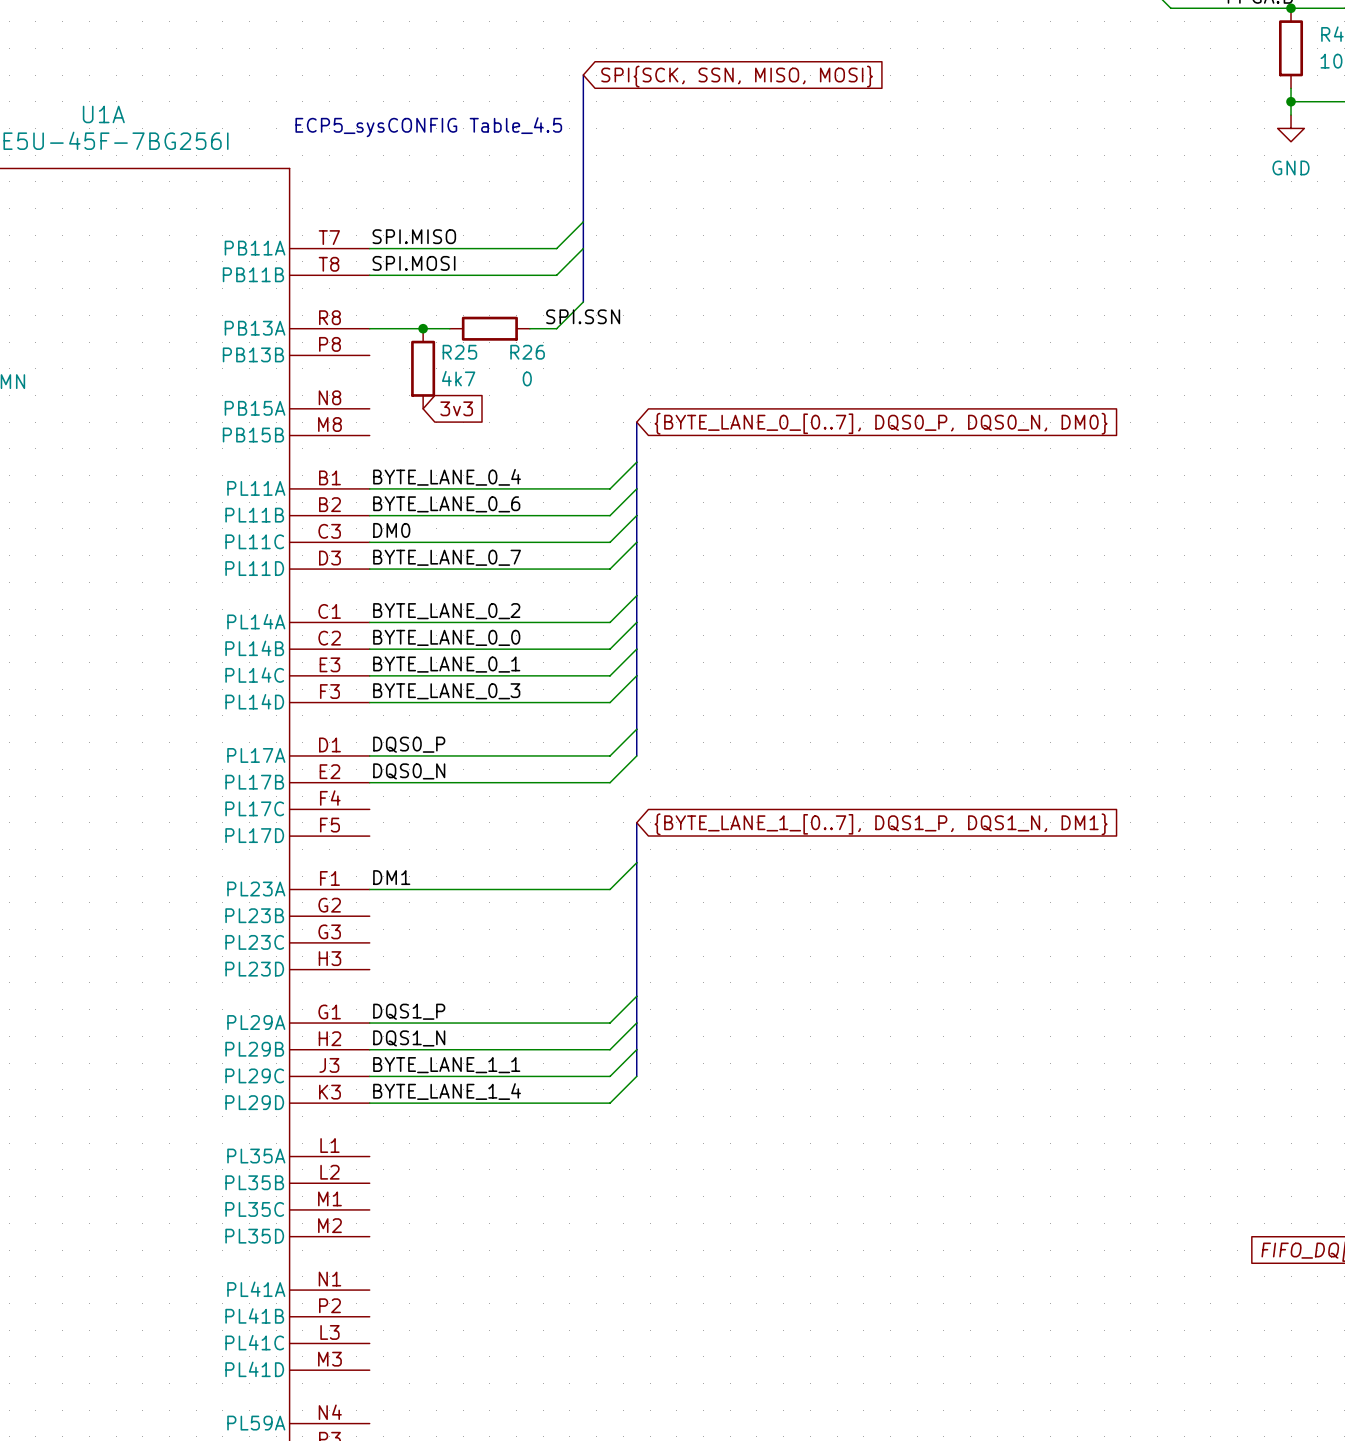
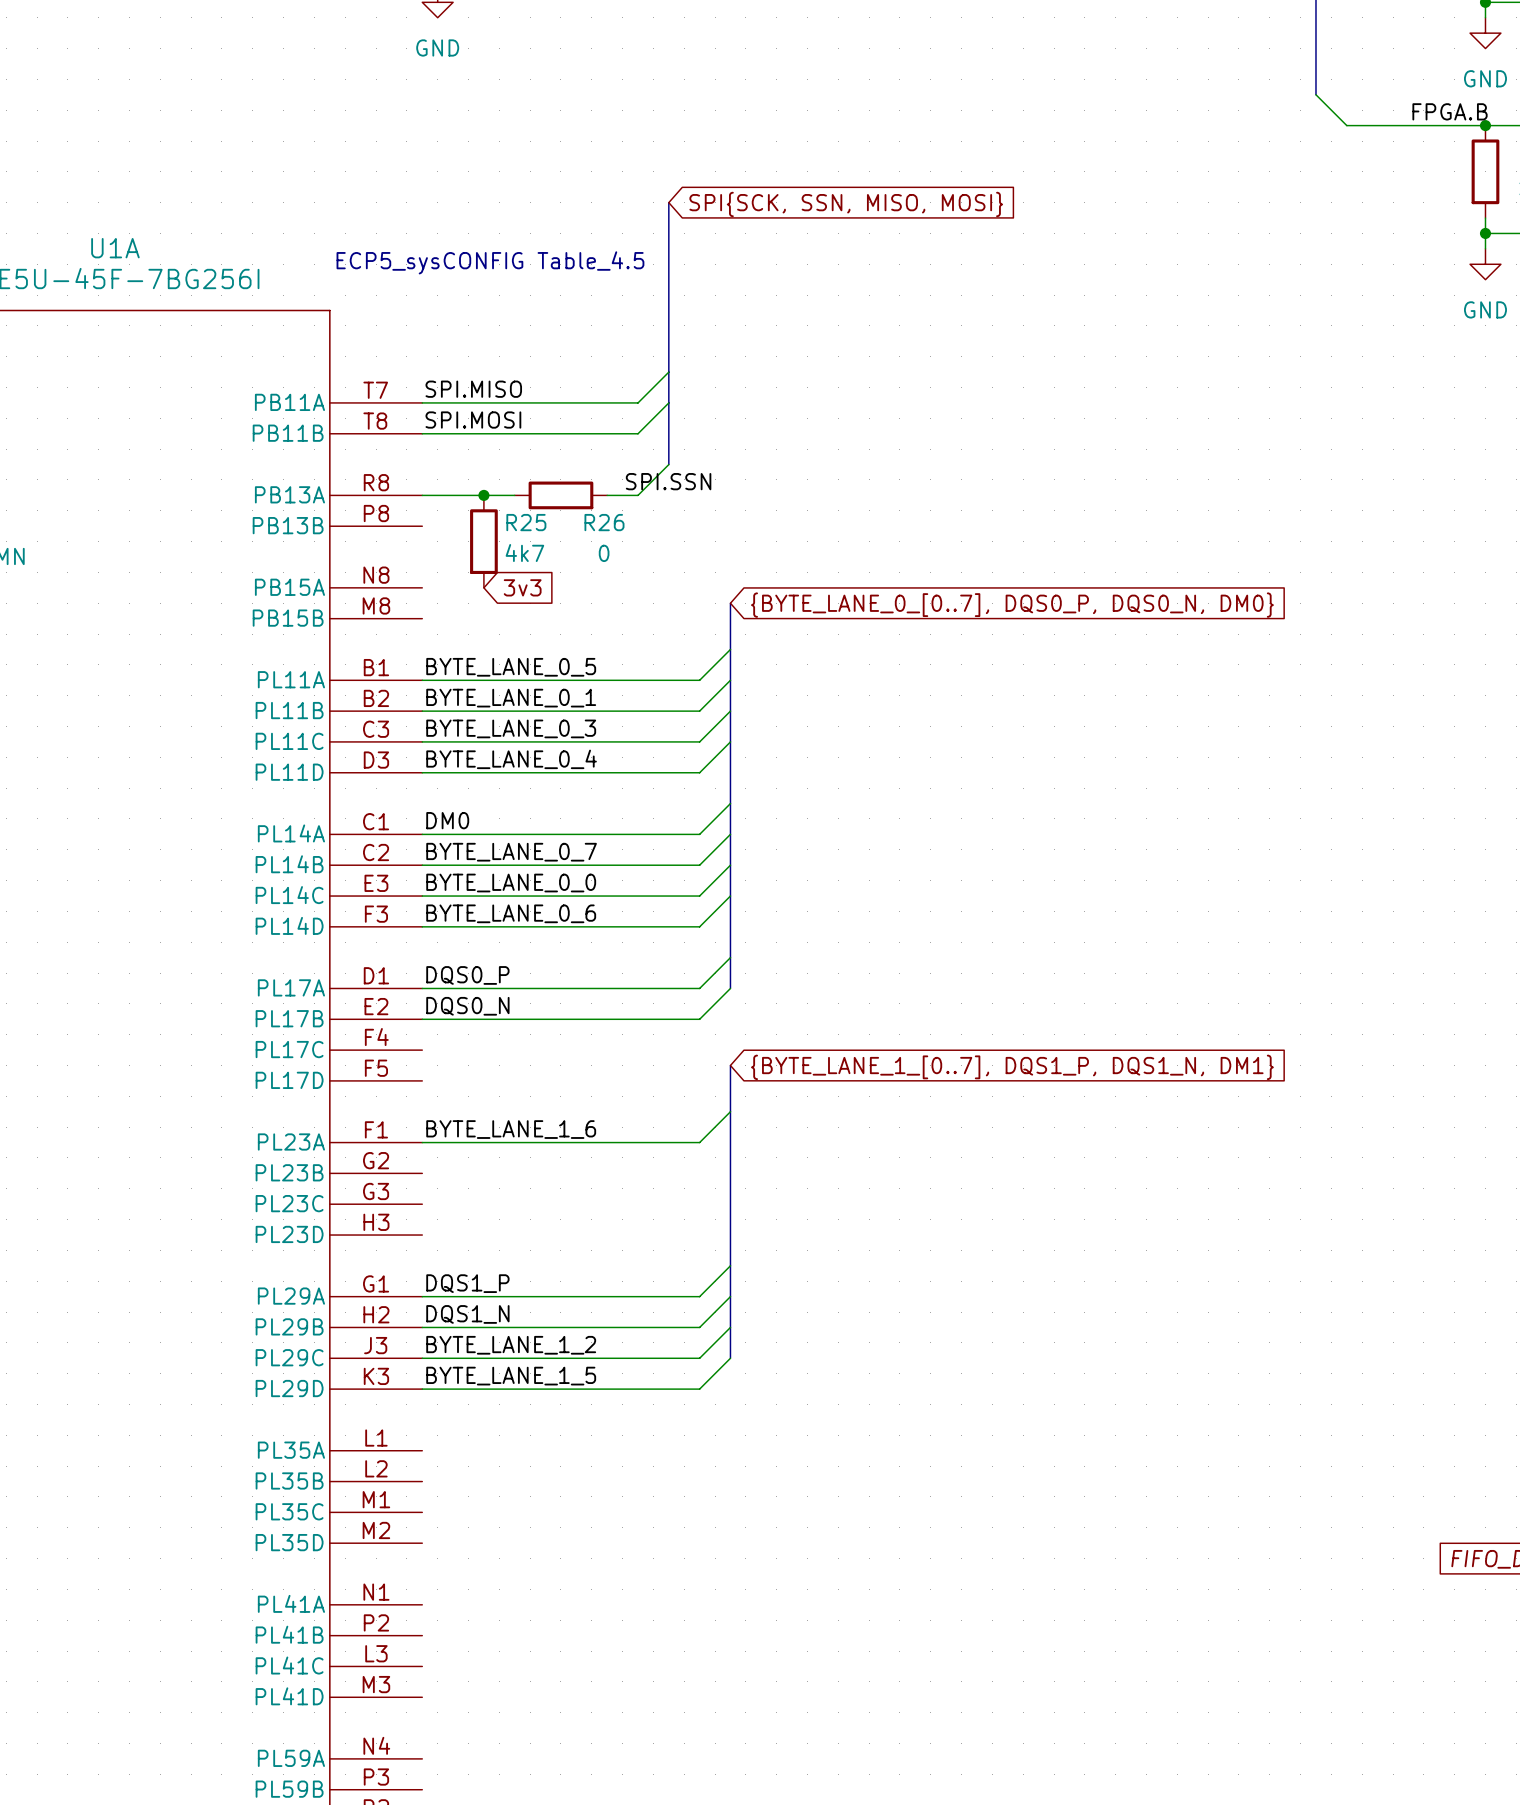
label: BYTE_LANE_0_4 (447, 477) -> BYTE_LANE_0_5 (511, 667)
label: BYTE_LANE_0_6 (446, 504) -> BYTE_LANE_0_1 (511, 698)
label: DM0 (391, 530) -> BYTE_LANE_0_3 (511, 728)
label: BYTE_LANE_0_7 (447, 557) -> BYTE_LANE_0_4 (511, 759)
label: BYTE_LANE_0_2 (446, 611) -> DM0 (447, 820)
label: BYTE_LANE_0_0 (446, 637) -> BYTE_LANE_0_7 (511, 852)
label: BYTE_LANE_0_1 (446, 664) -> BYTE_LANE_0_0 (511, 883)
label: BYTE_LANE_0_3 (446, 691) -> BYTE_LANE_0_6 (511, 913)
label: DM1 (391, 877) -> BYTE_LANE_1_6 (511, 1129)
label: BYTE_LANE_1_1 (446, 1065) -> BYTE_LANE_1_2 (511, 1345)
label: BYTE_LANE_1_4 (447, 1091) -> BYTE_LANE_1_5 (511, 1376)

